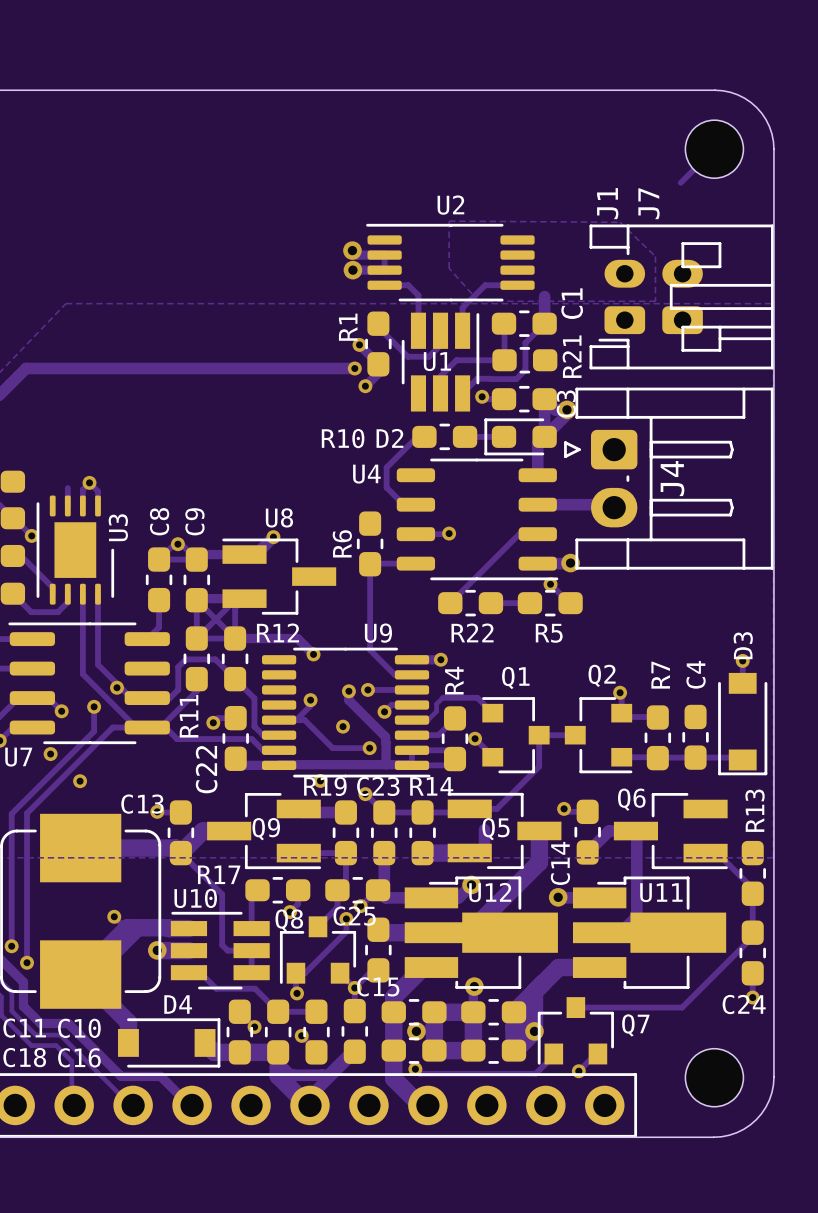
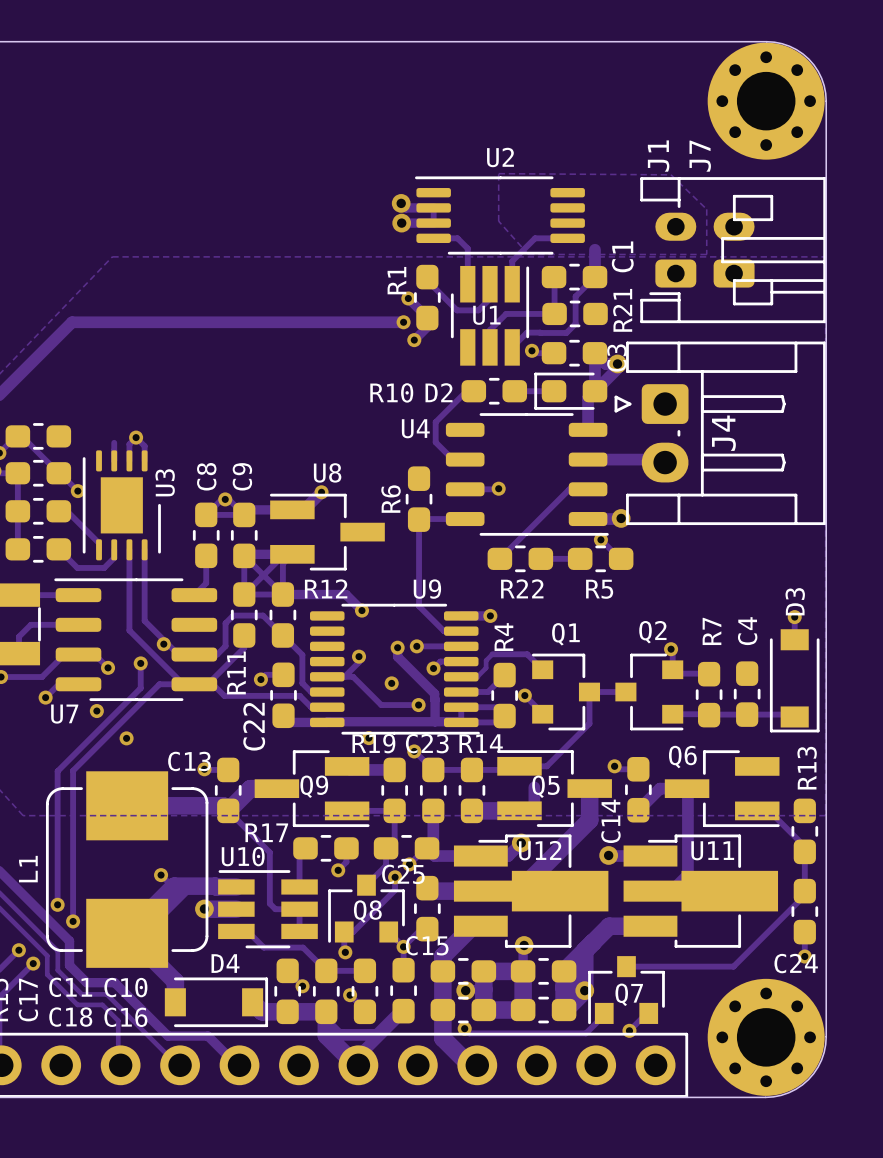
part footprint: [685, 120, 744, 179] -> [707, 42, 825, 160]
Q8 name position: Q8 (289, 920) -> Q8 (367, 911)
Q7 name position: Q7 (635, 1025) -> Q7 (629, 994)
part footprint: [685, 1048, 744, 1107] -> [707, 978, 825, 1096]

